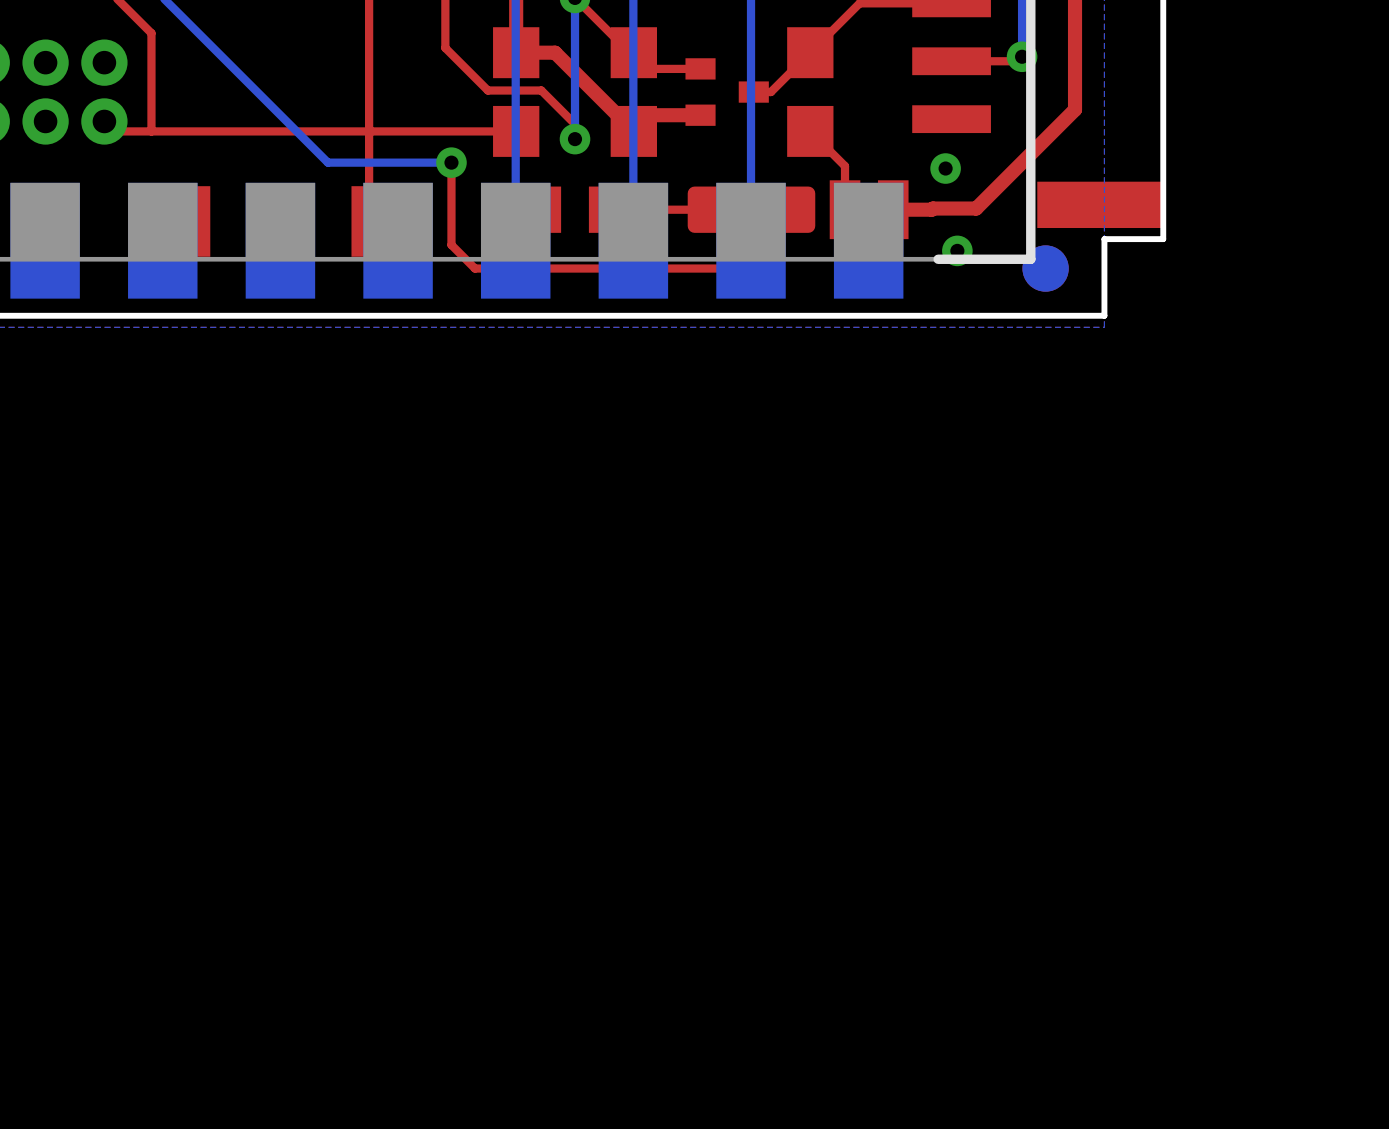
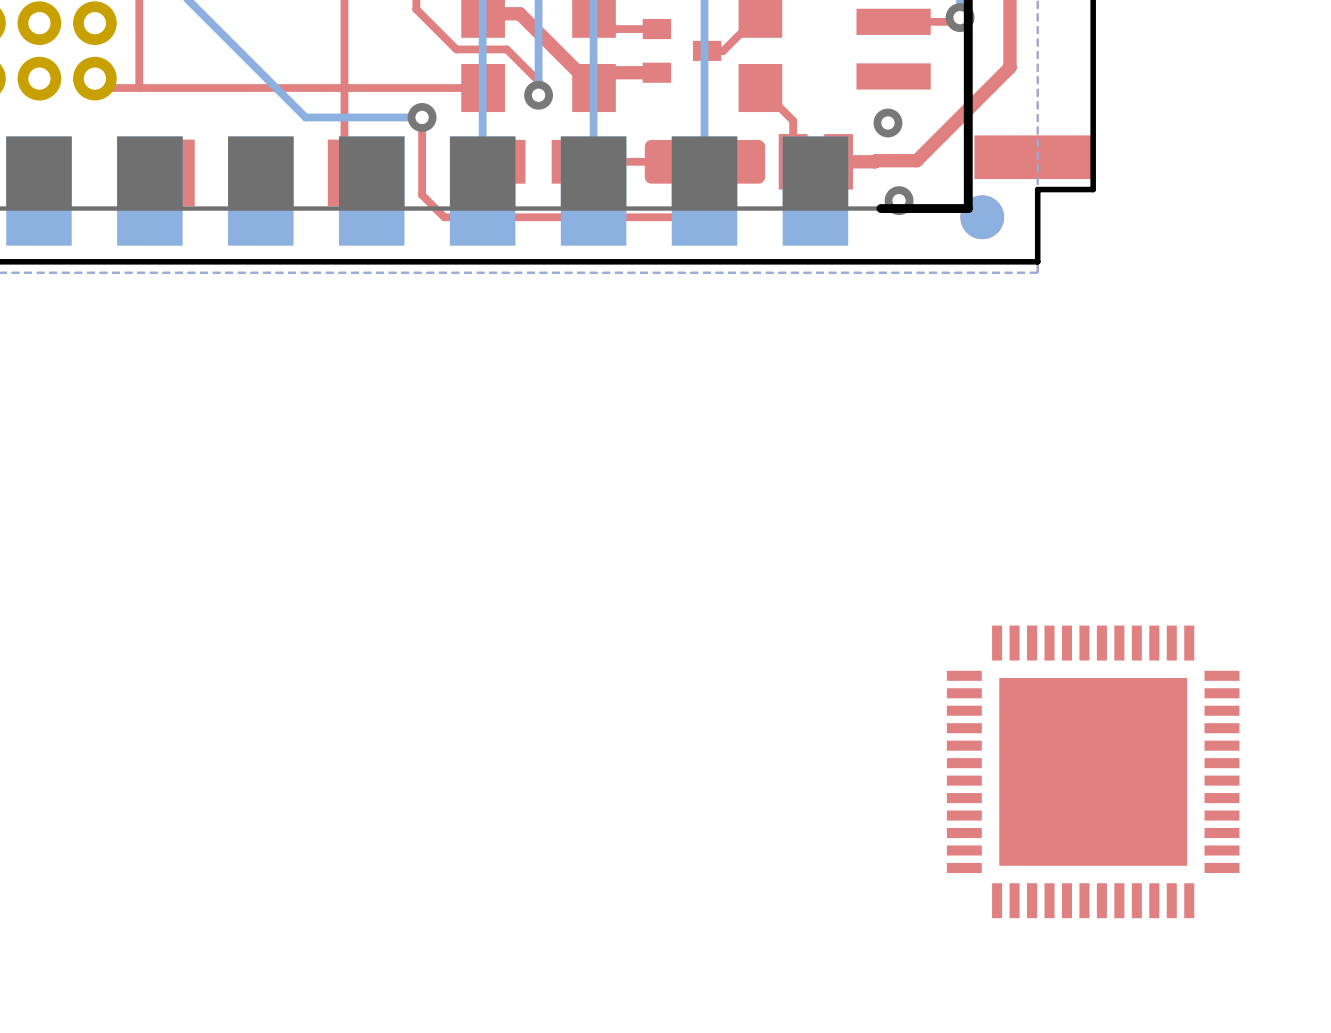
part: none -> (1093, 771)

